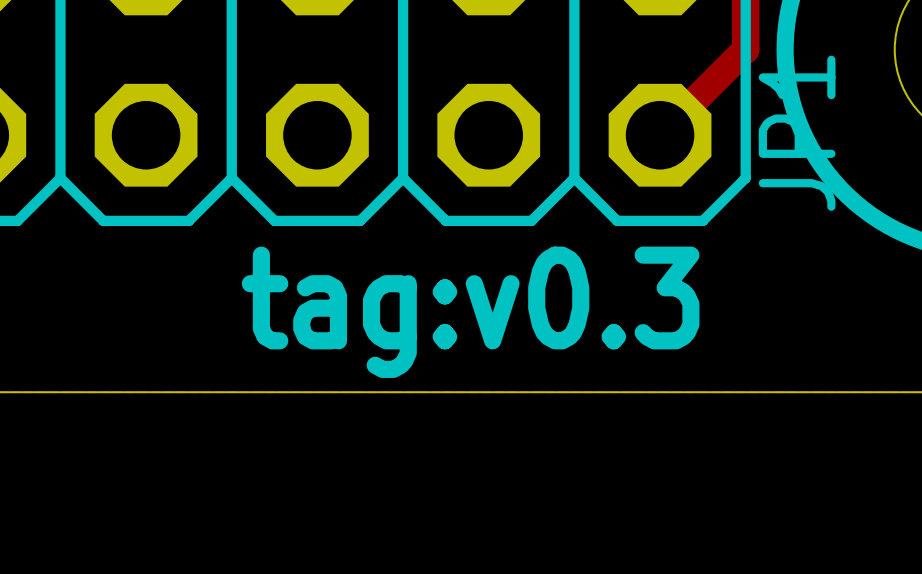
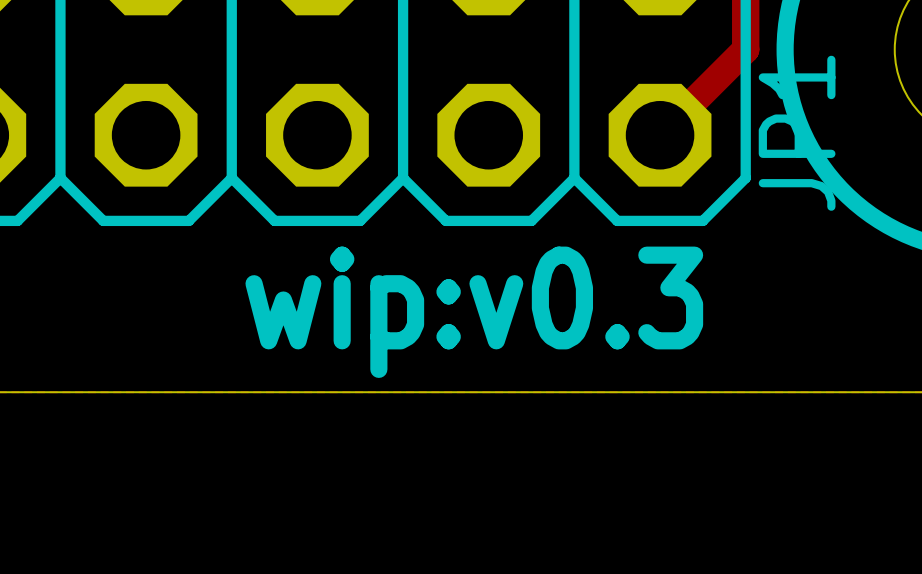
text: tag:v0.3 (470, 312) -> wip:v0.3 (474, 312)

